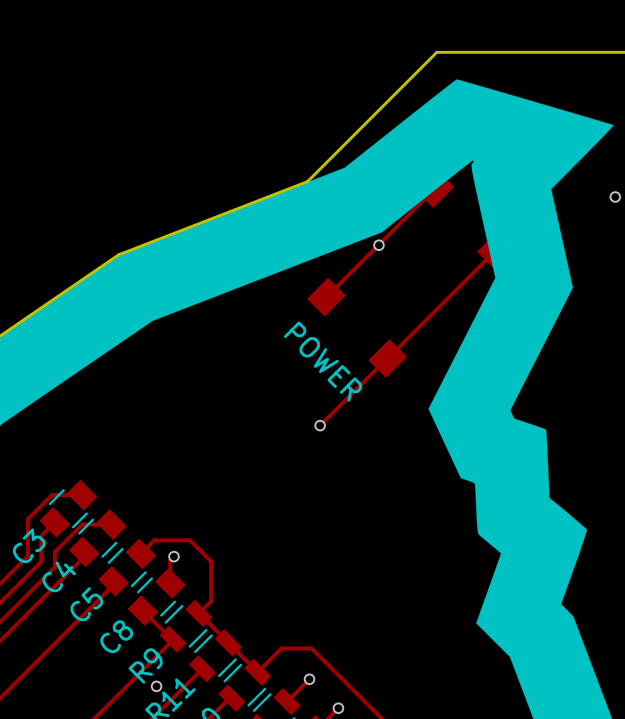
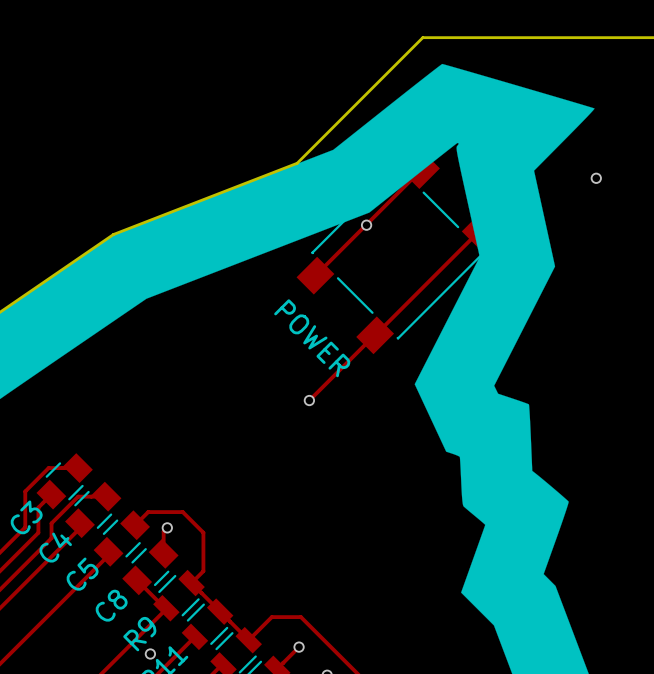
part footprint: [306, 169, 516, 378] -> [296, 151, 500, 355]

